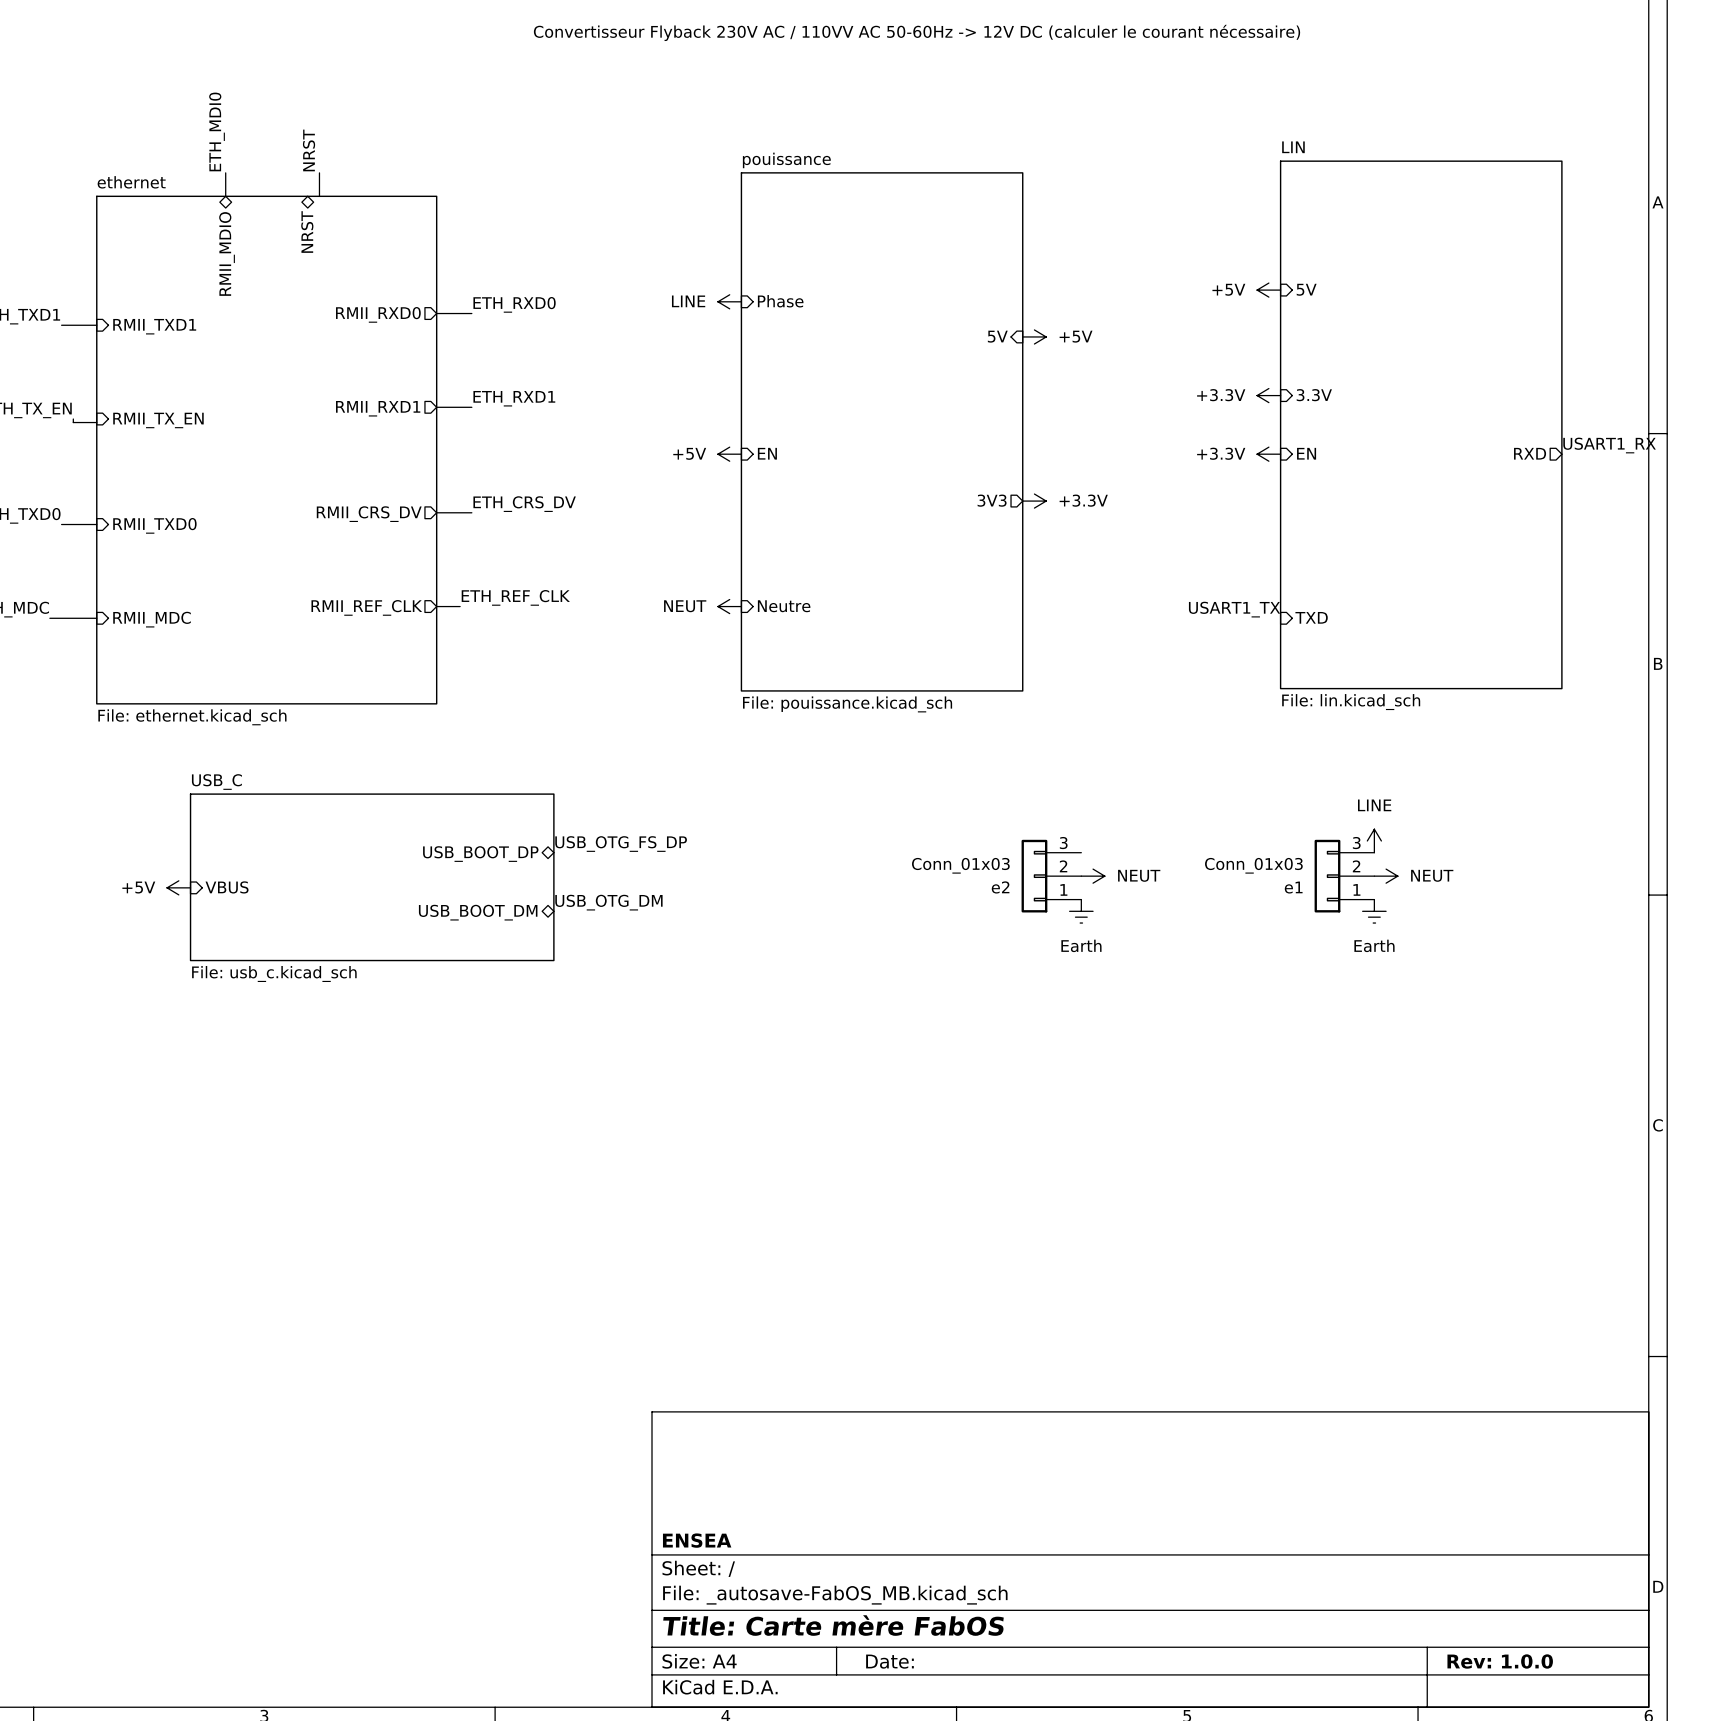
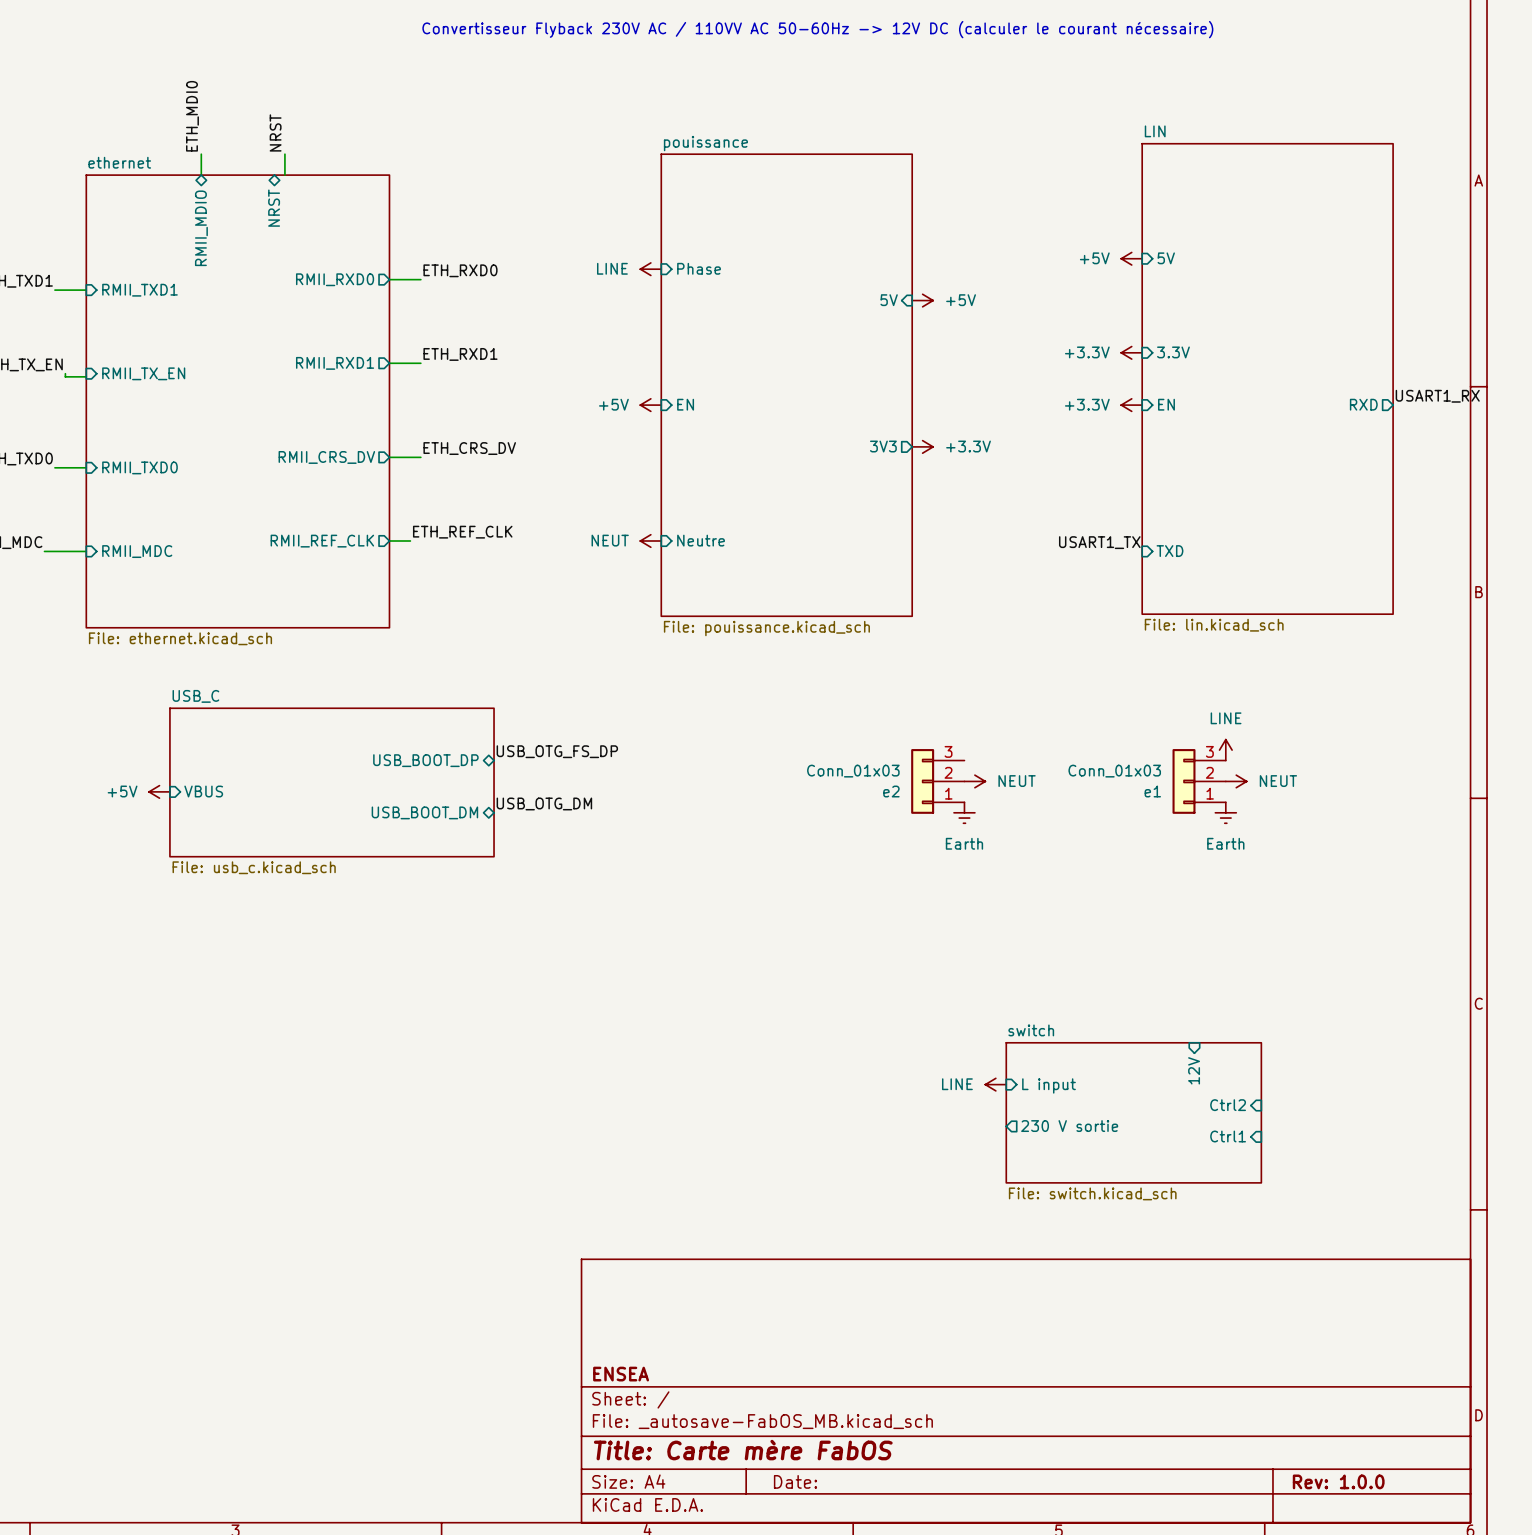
sheet pin: none -> 12V (1194, 1070)
power symbol: none -> LINE (995, 1084)
sheet pin: none -> L input (1049, 1085)
sheet pin: none -> Ctrl2 (1228, 1105)
sheet switch: none -> File: switch.kicad_sch (1133, 1112)
sheet pin: none -> 230 V sortie (1069, 1126)
sheet pin: none -> Ctrl1 (1228, 1136)

